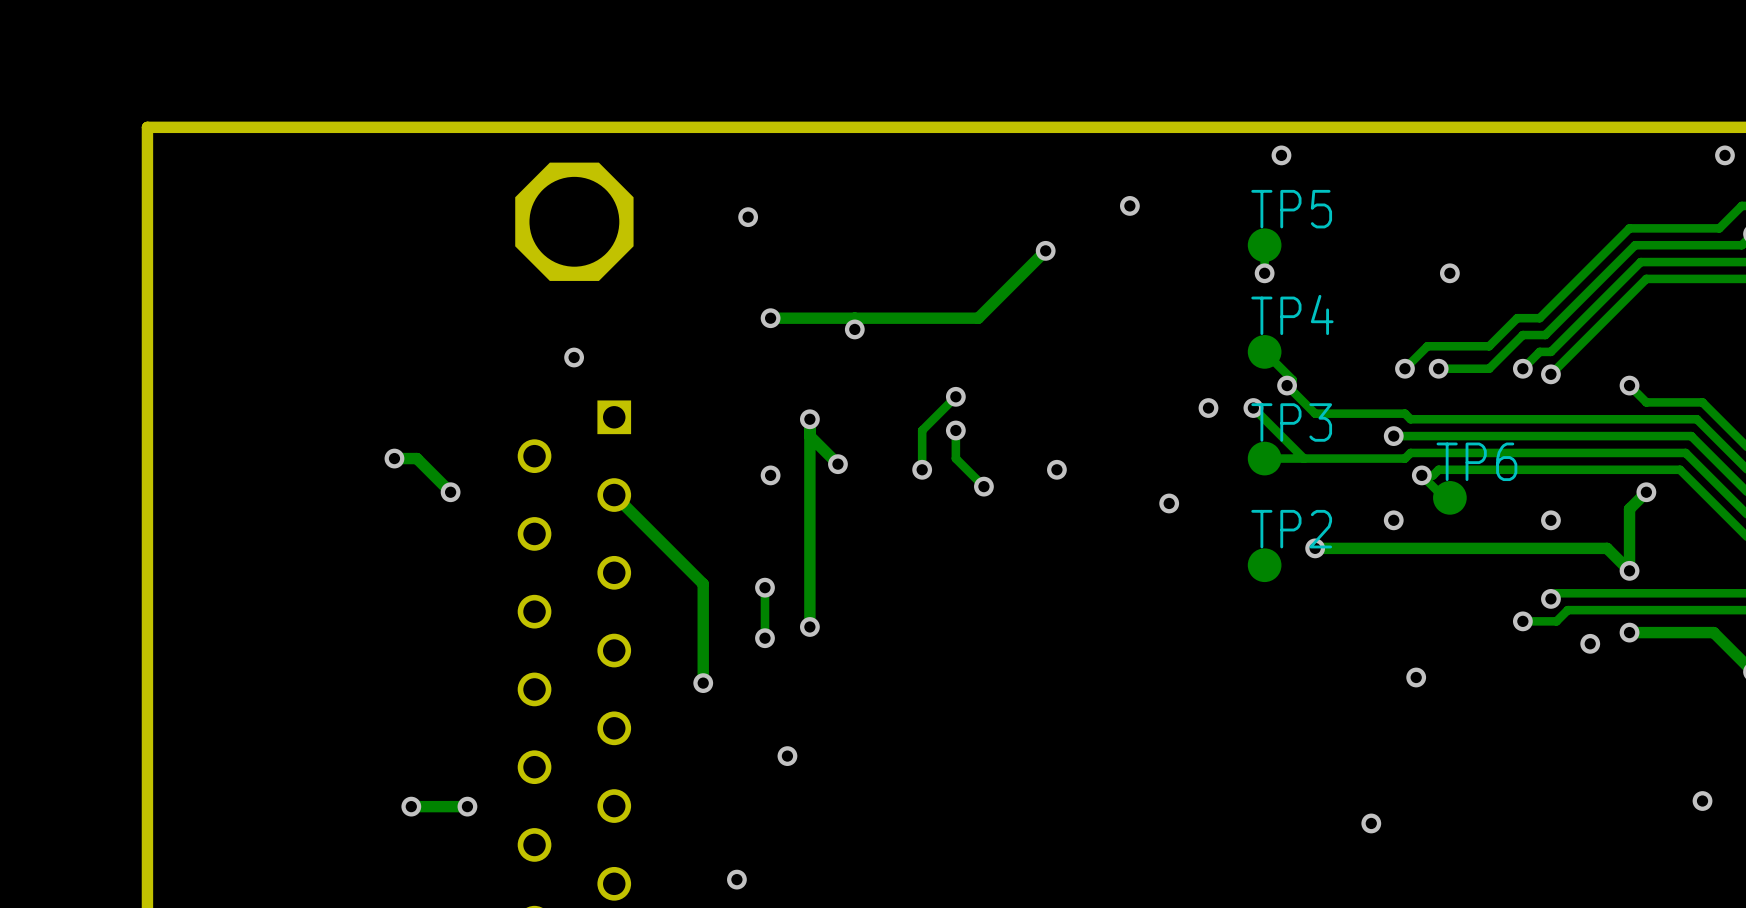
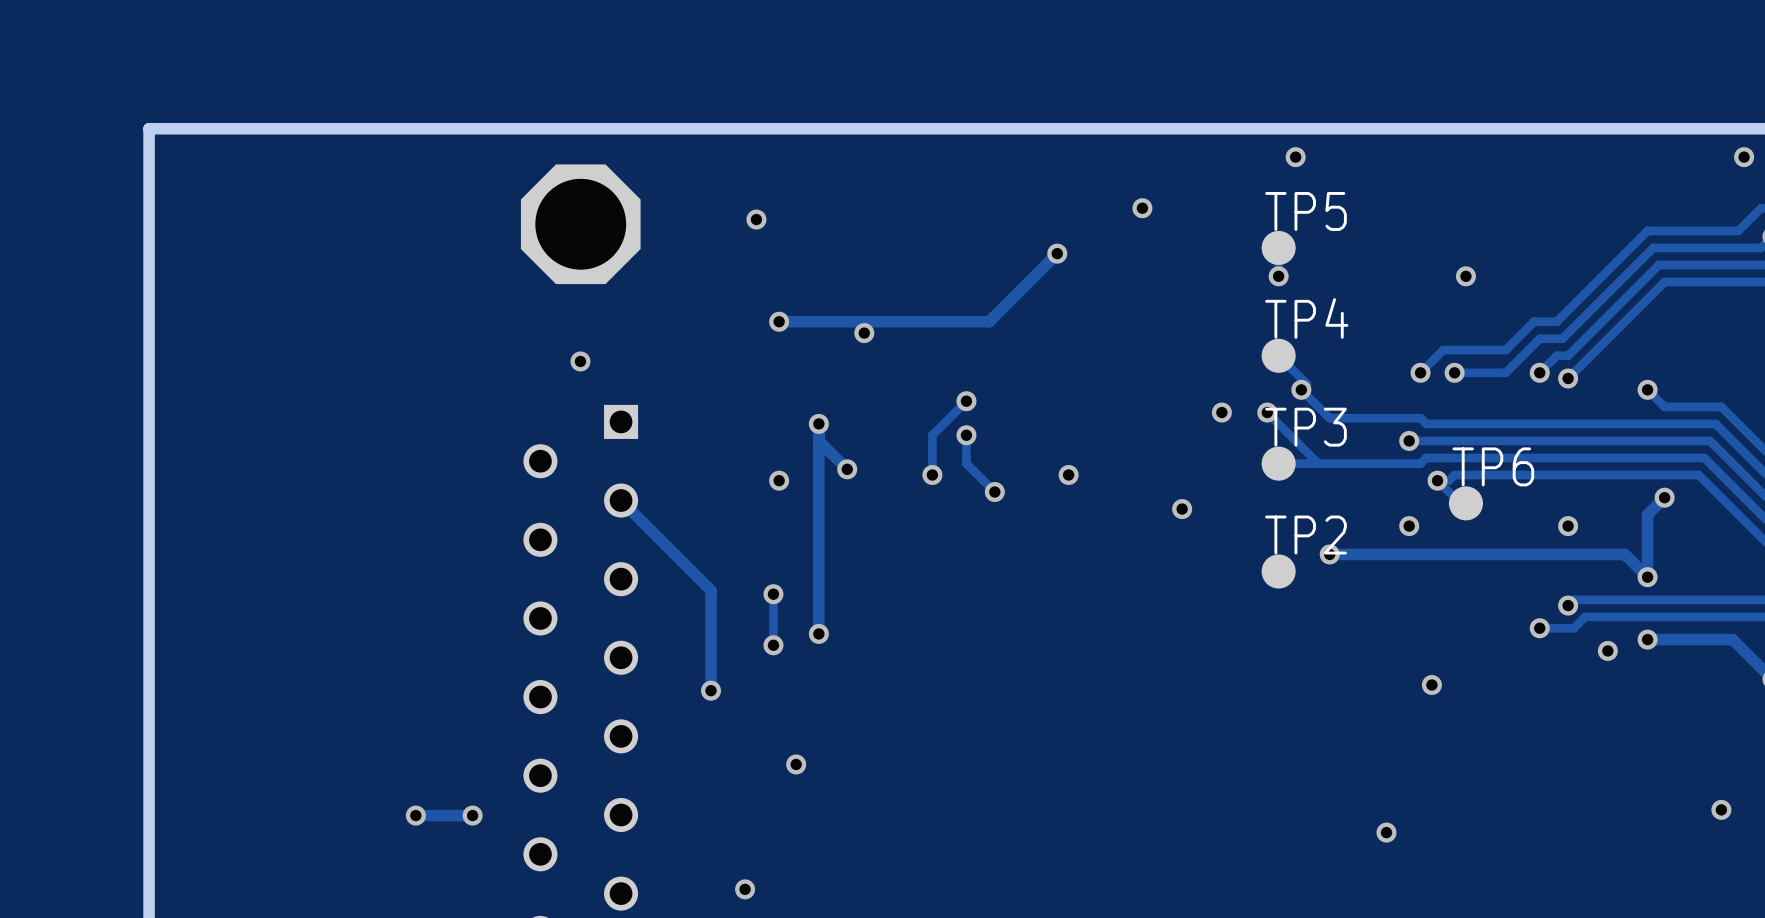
track: (394, 458) (416, 458) (450, 492) -> none
via: (394, 458) -> none
via: (450, 492) -> none

